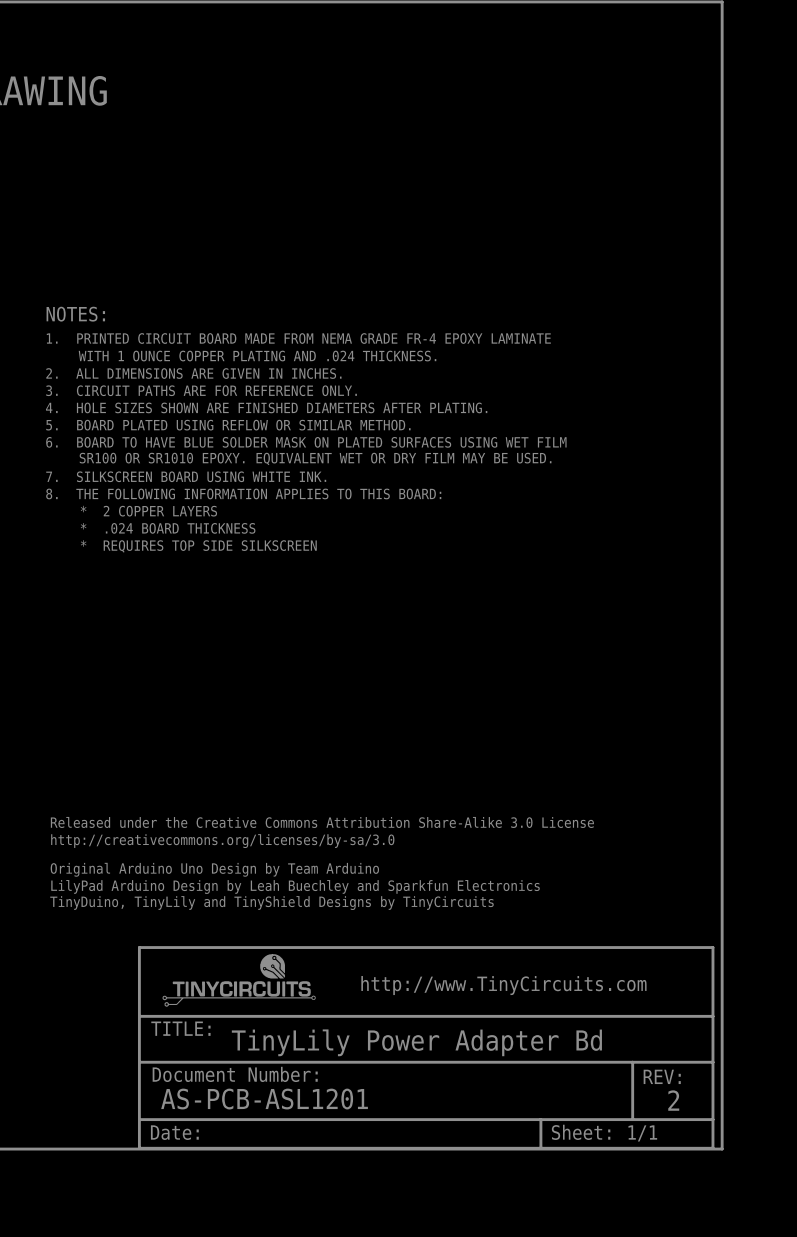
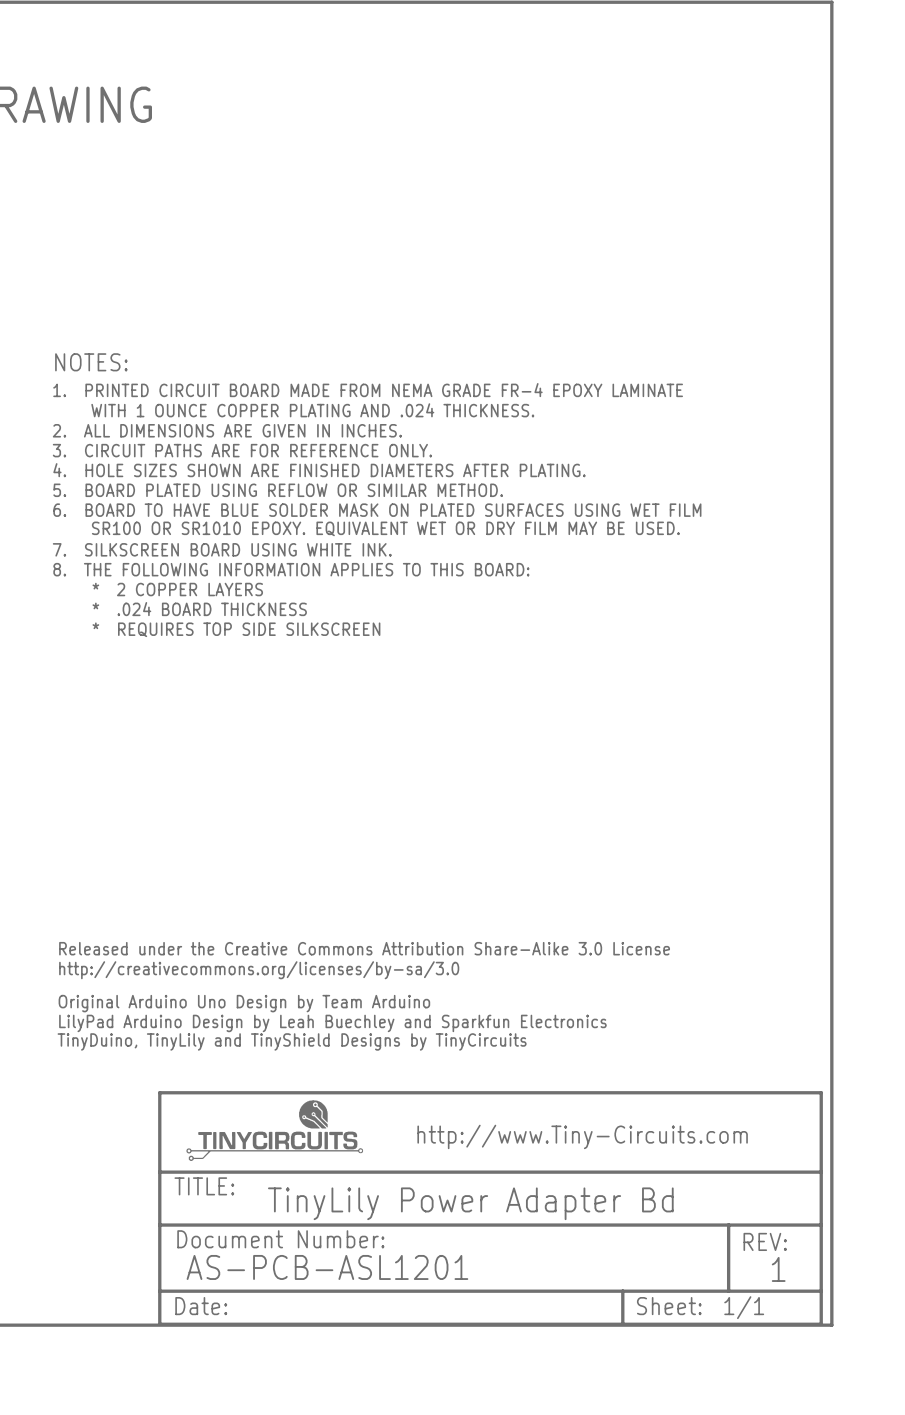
drawing shape: [137, 946, 715, 1150] -> [158, 1091, 823, 1326]
text: 2 (673, 1100) -> 1 (778, 1269)

